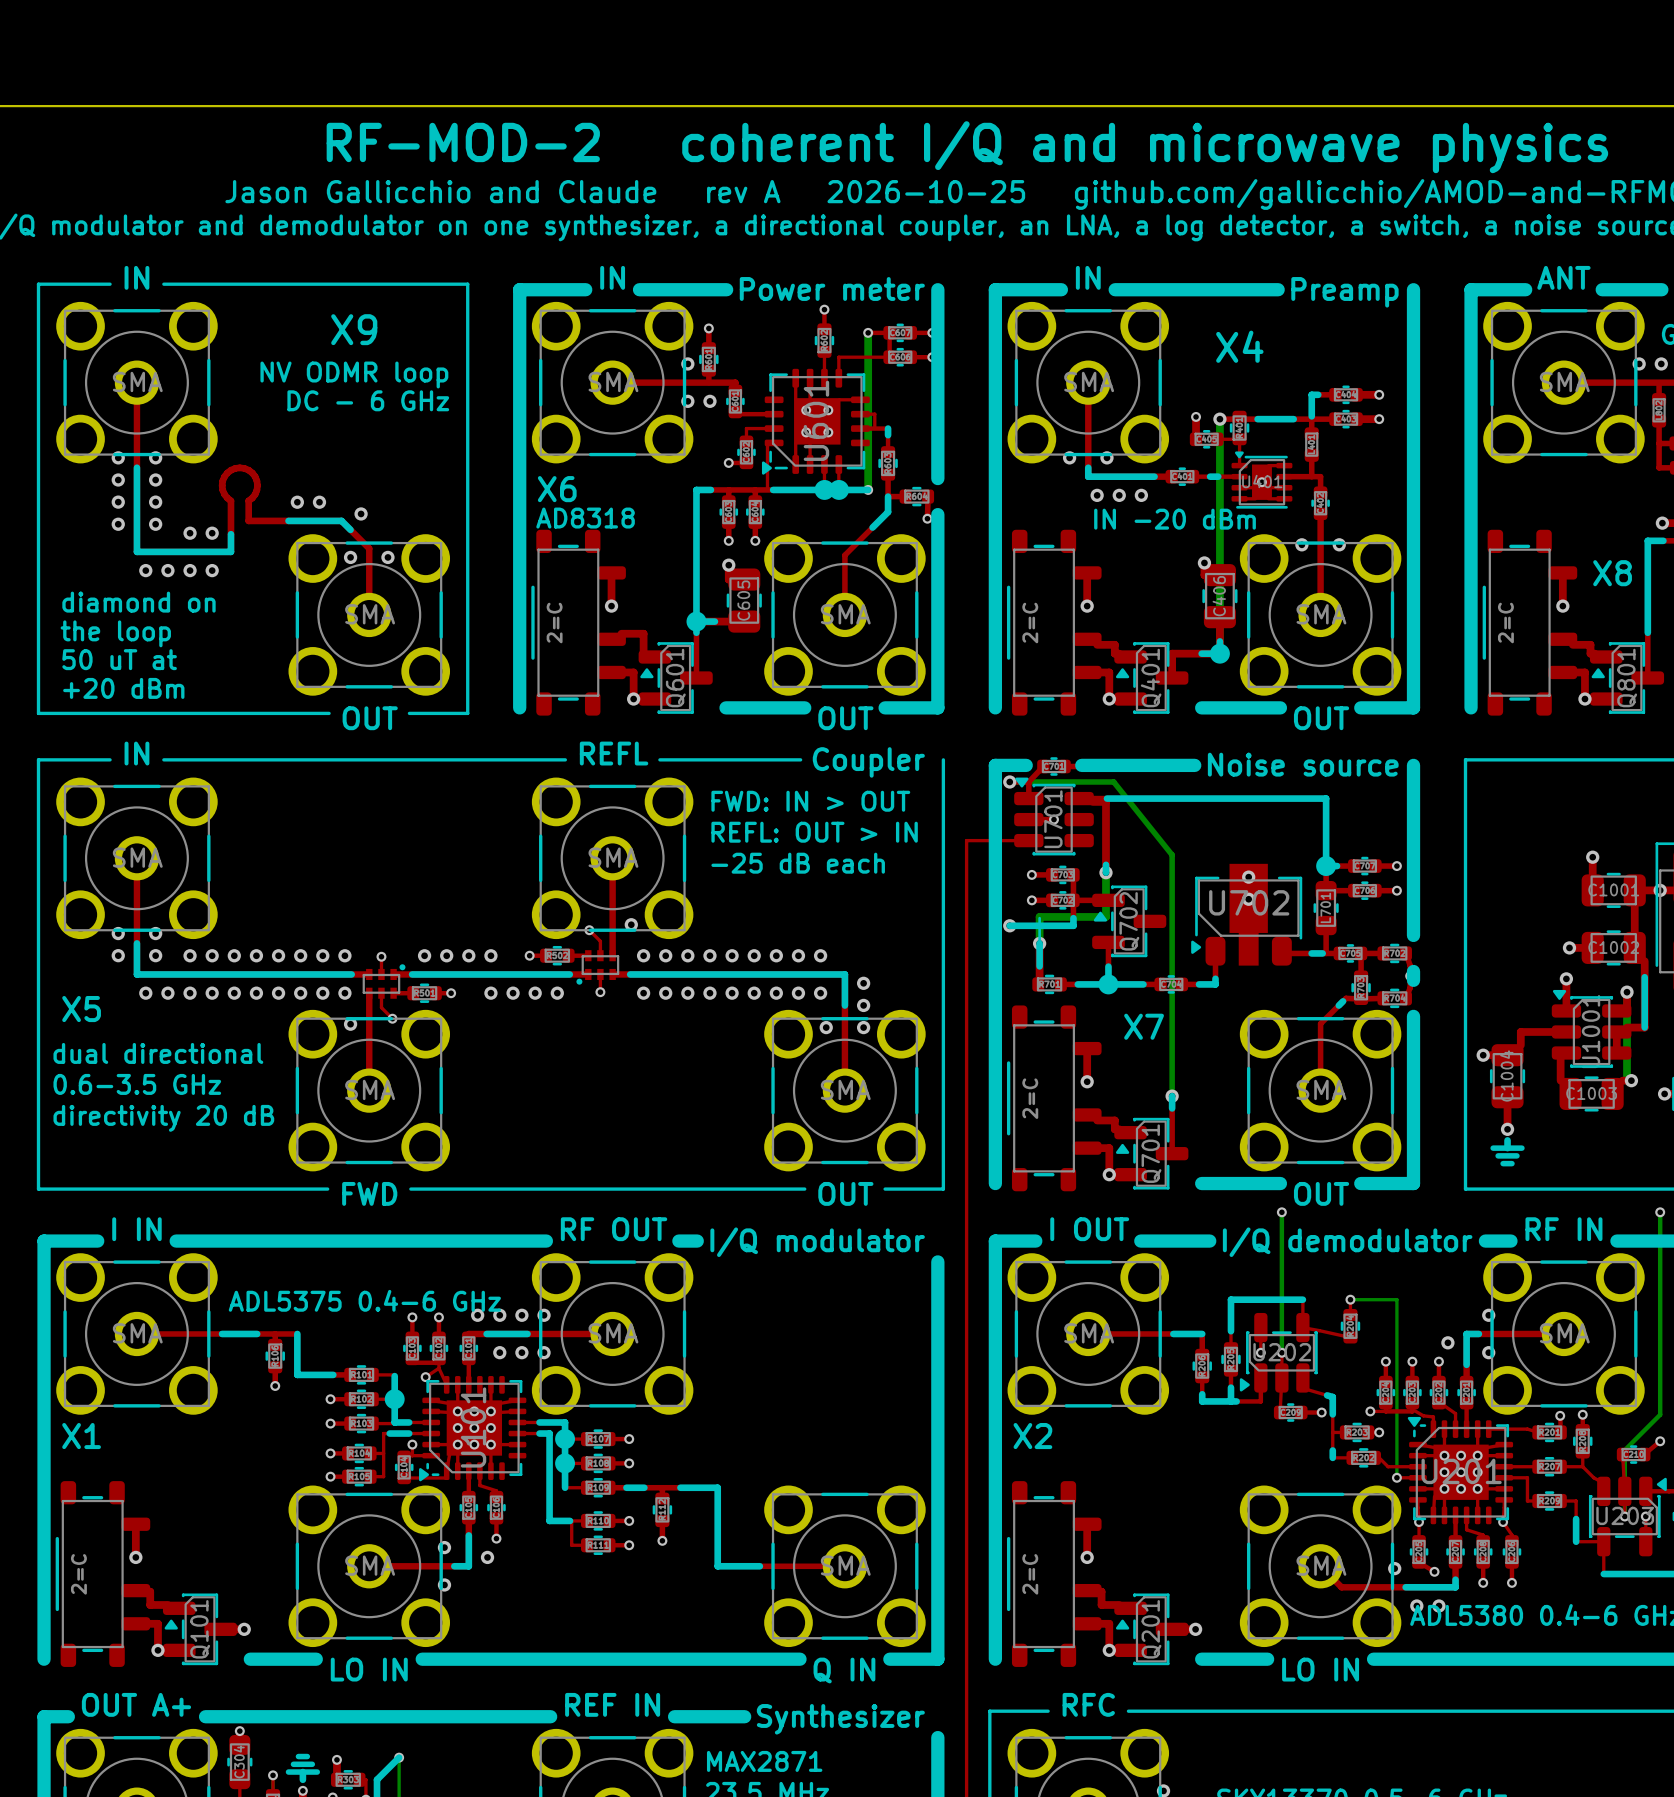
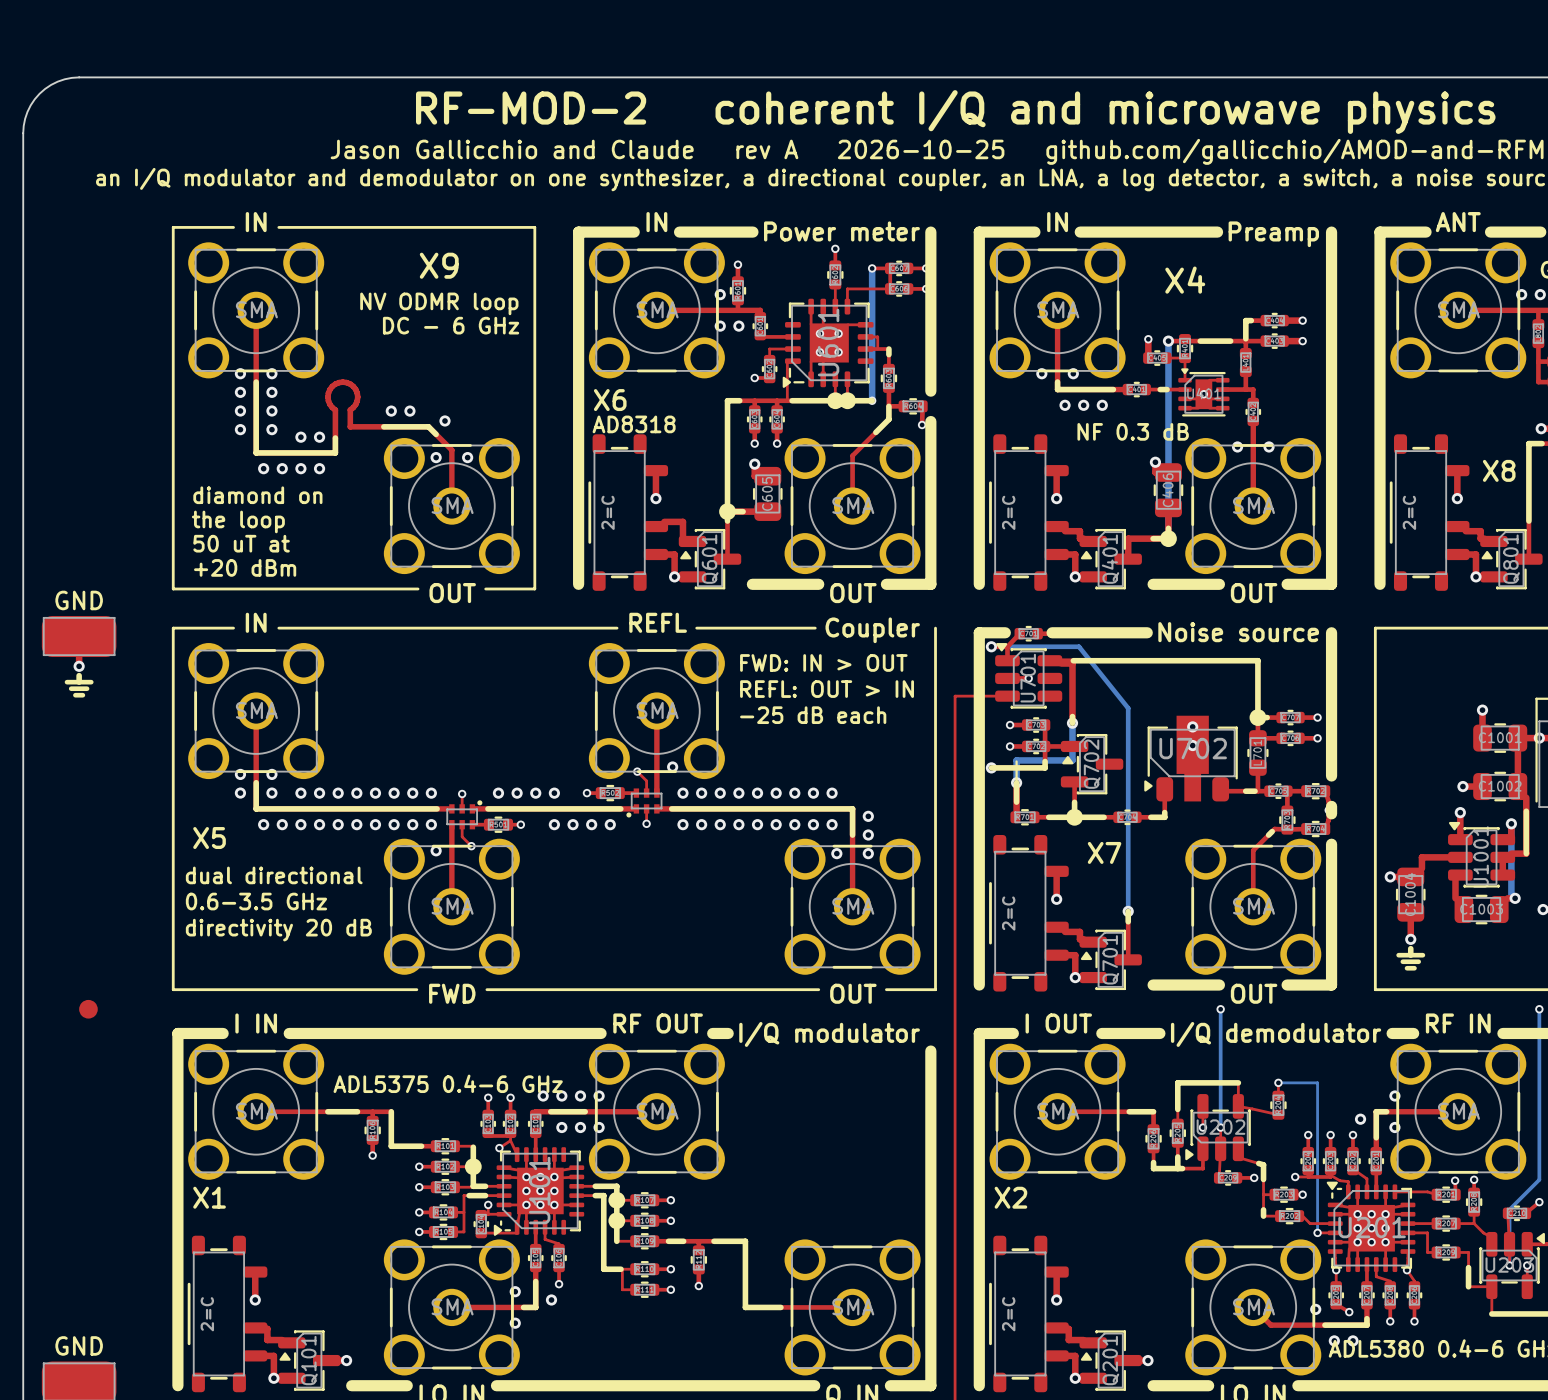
text: IN -20 dBm (1175, 519) -> NF 0.3 dB (1133, 431)

